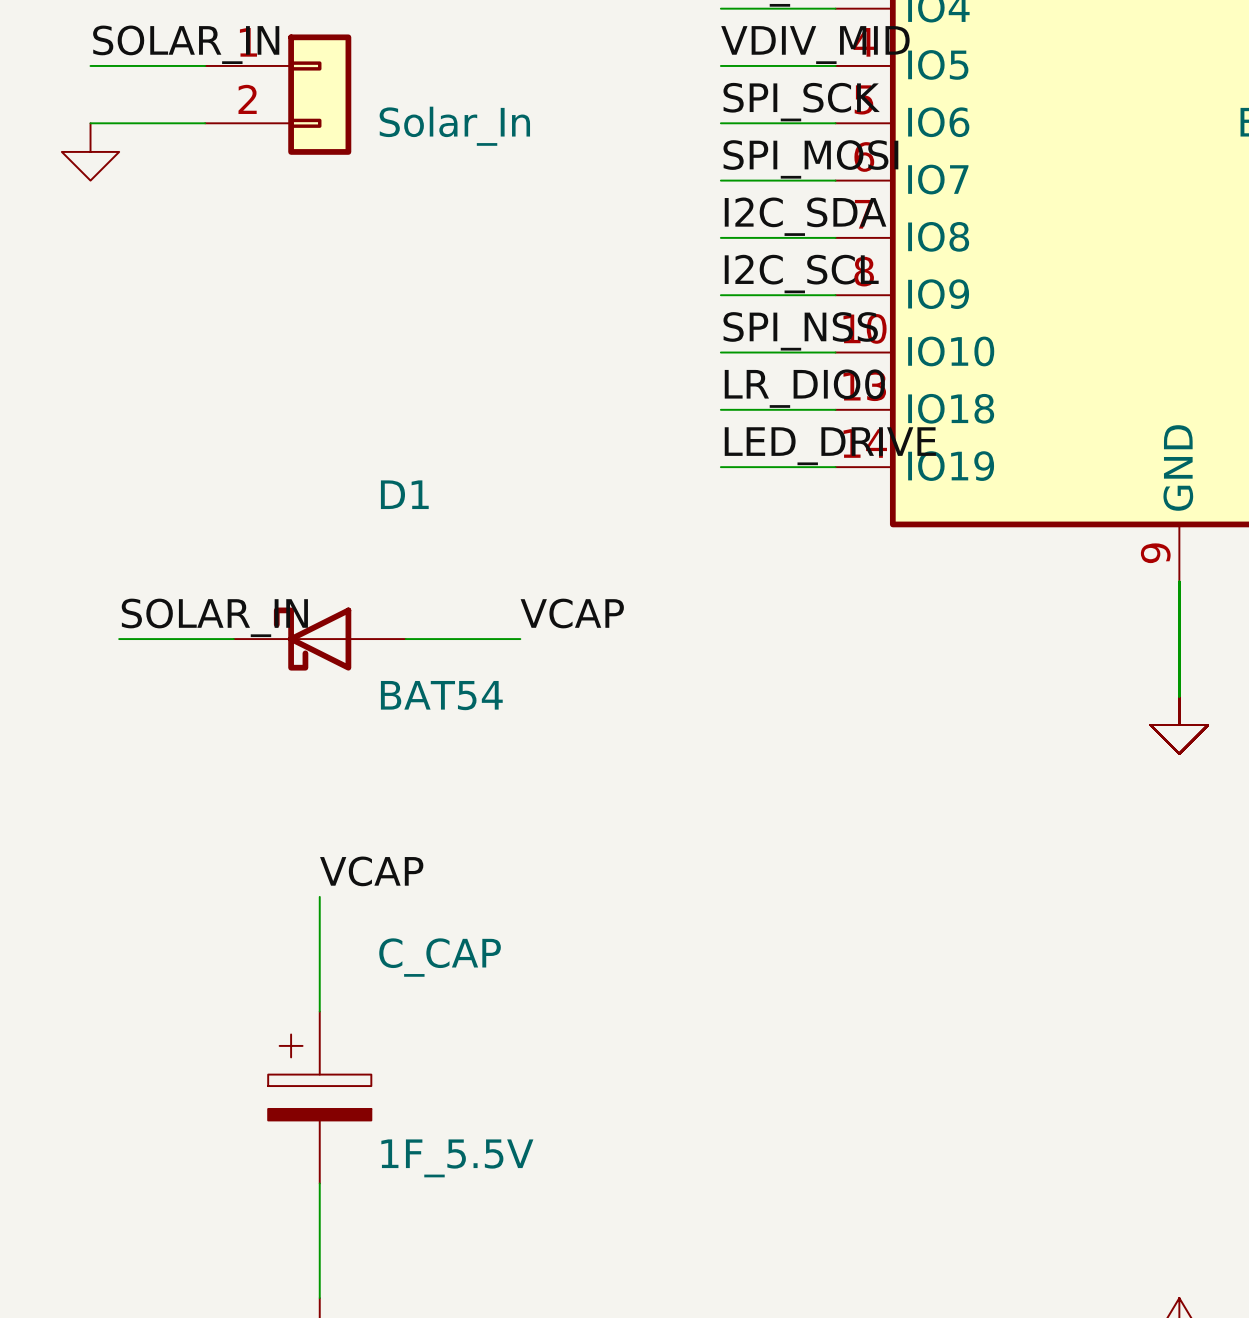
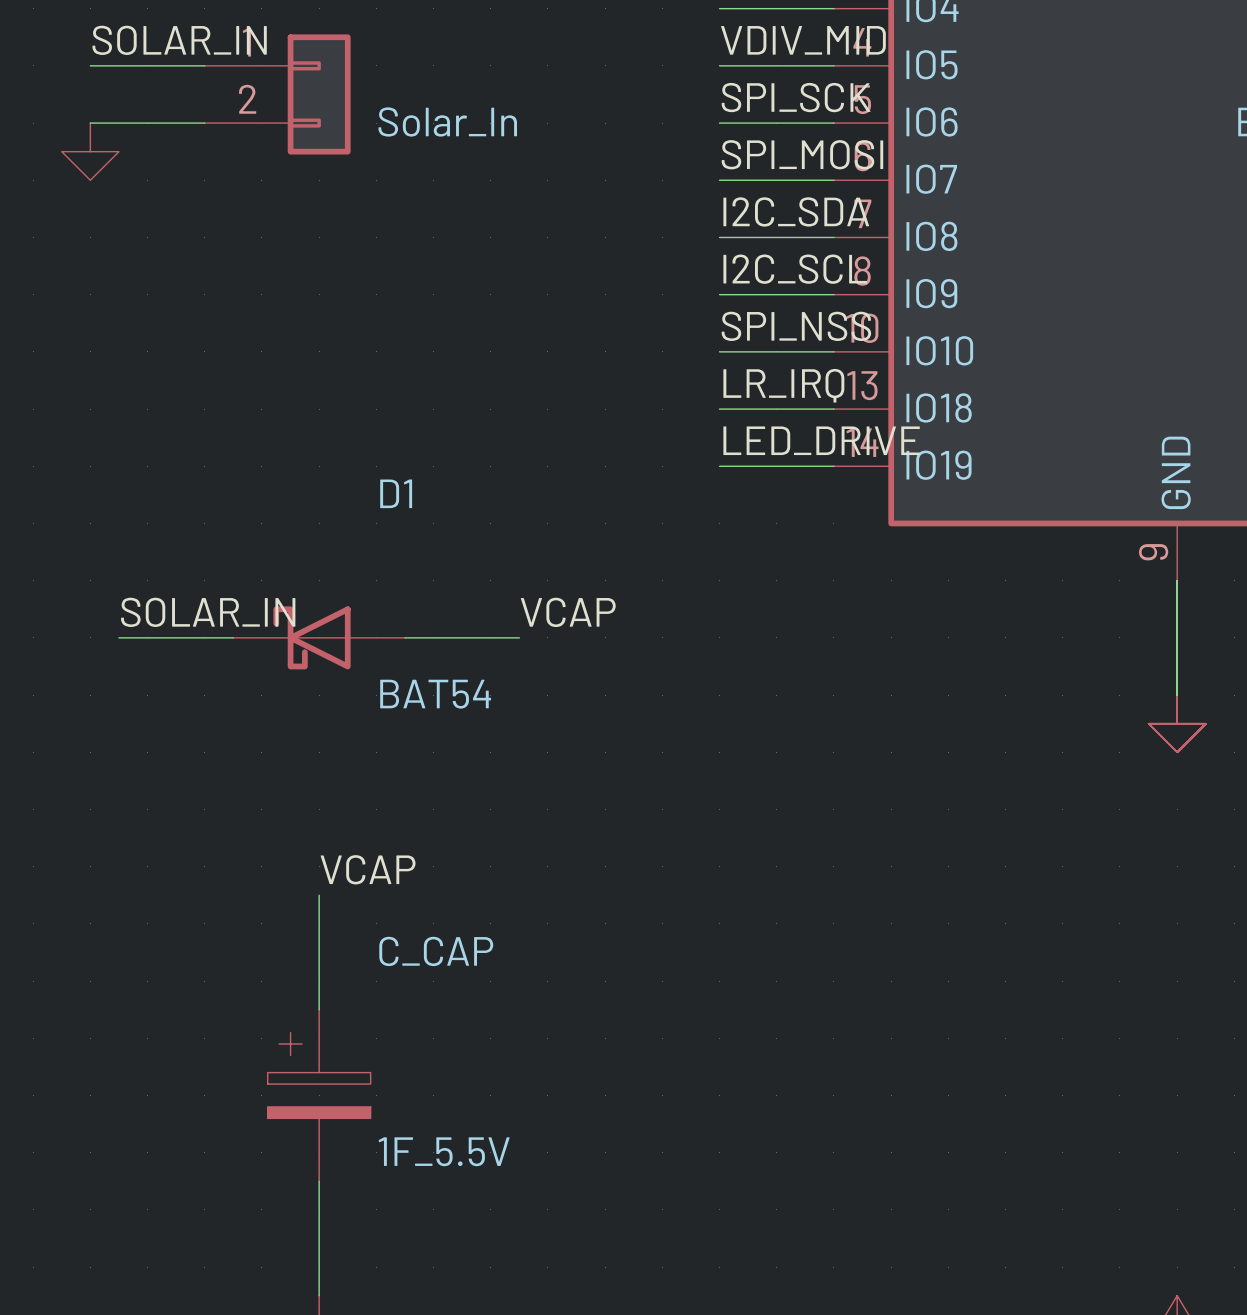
label: LR_DIO0 (804, 388) -> LR_IRQ (783, 385)

